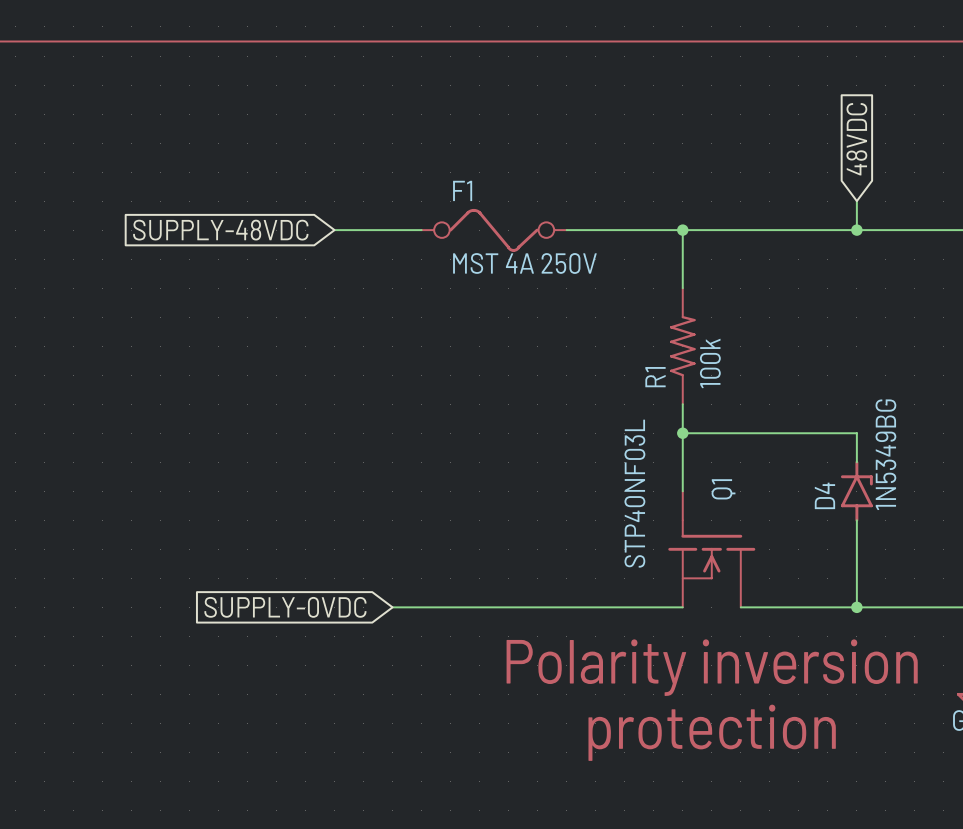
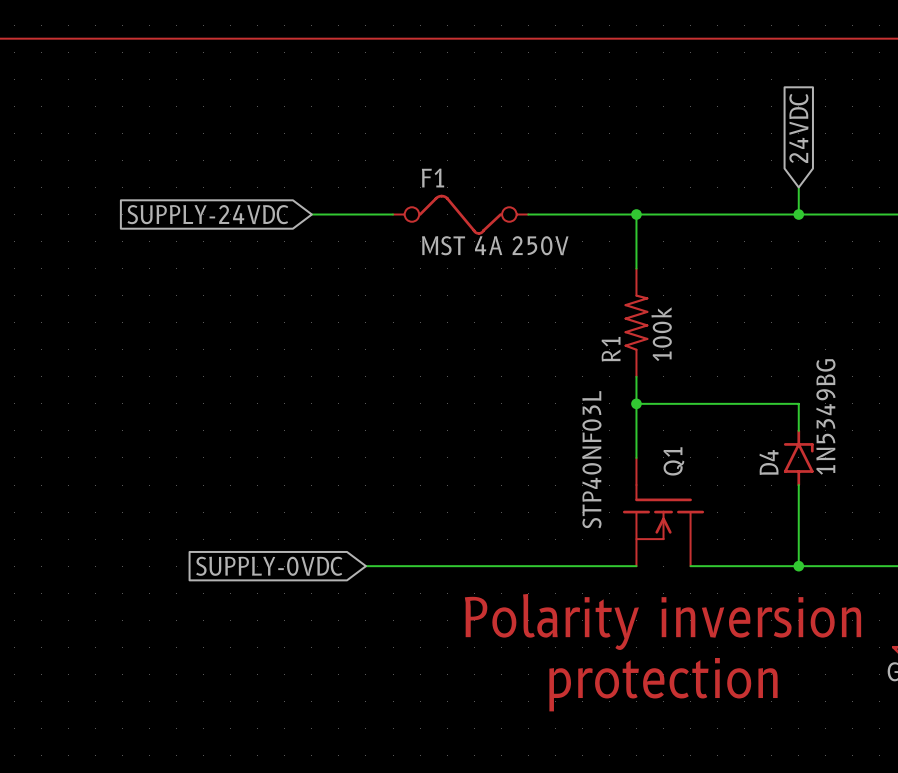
global label: 48VDC (856, 139) -> 24VDC (798, 128)
global label: SUPPLY-48VDC (220, 230) -> SUPPLY-24VDC (207, 214)

